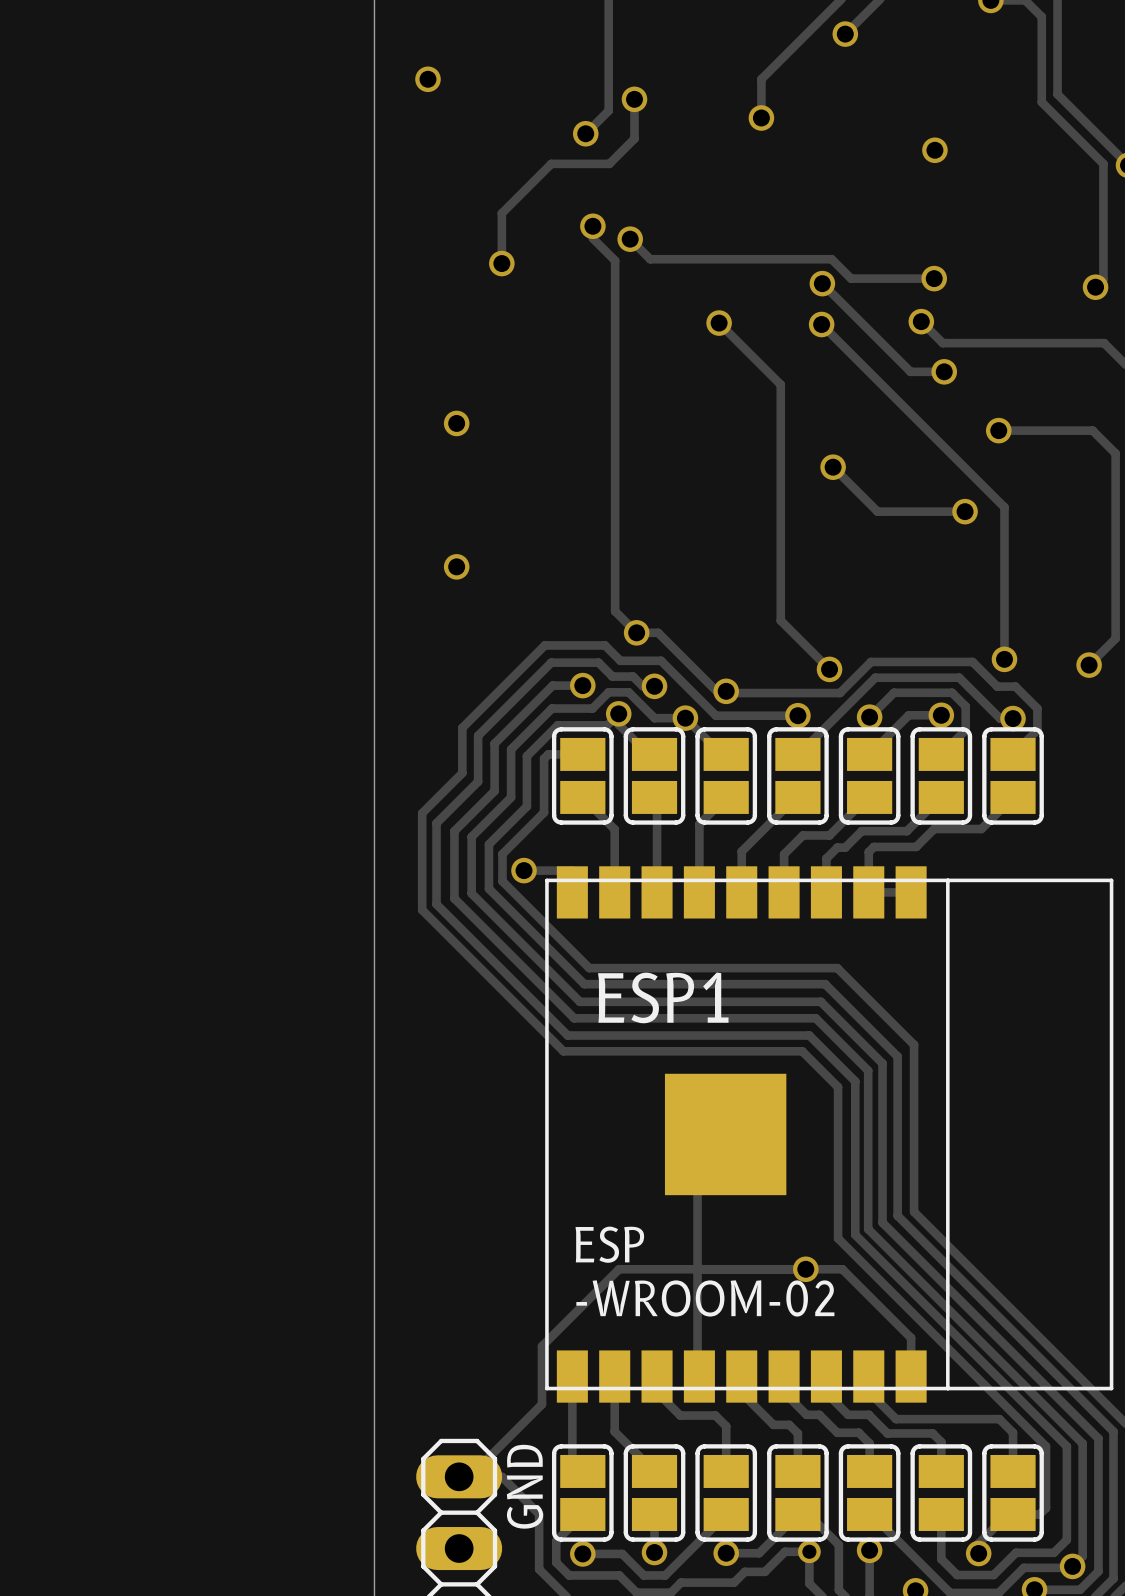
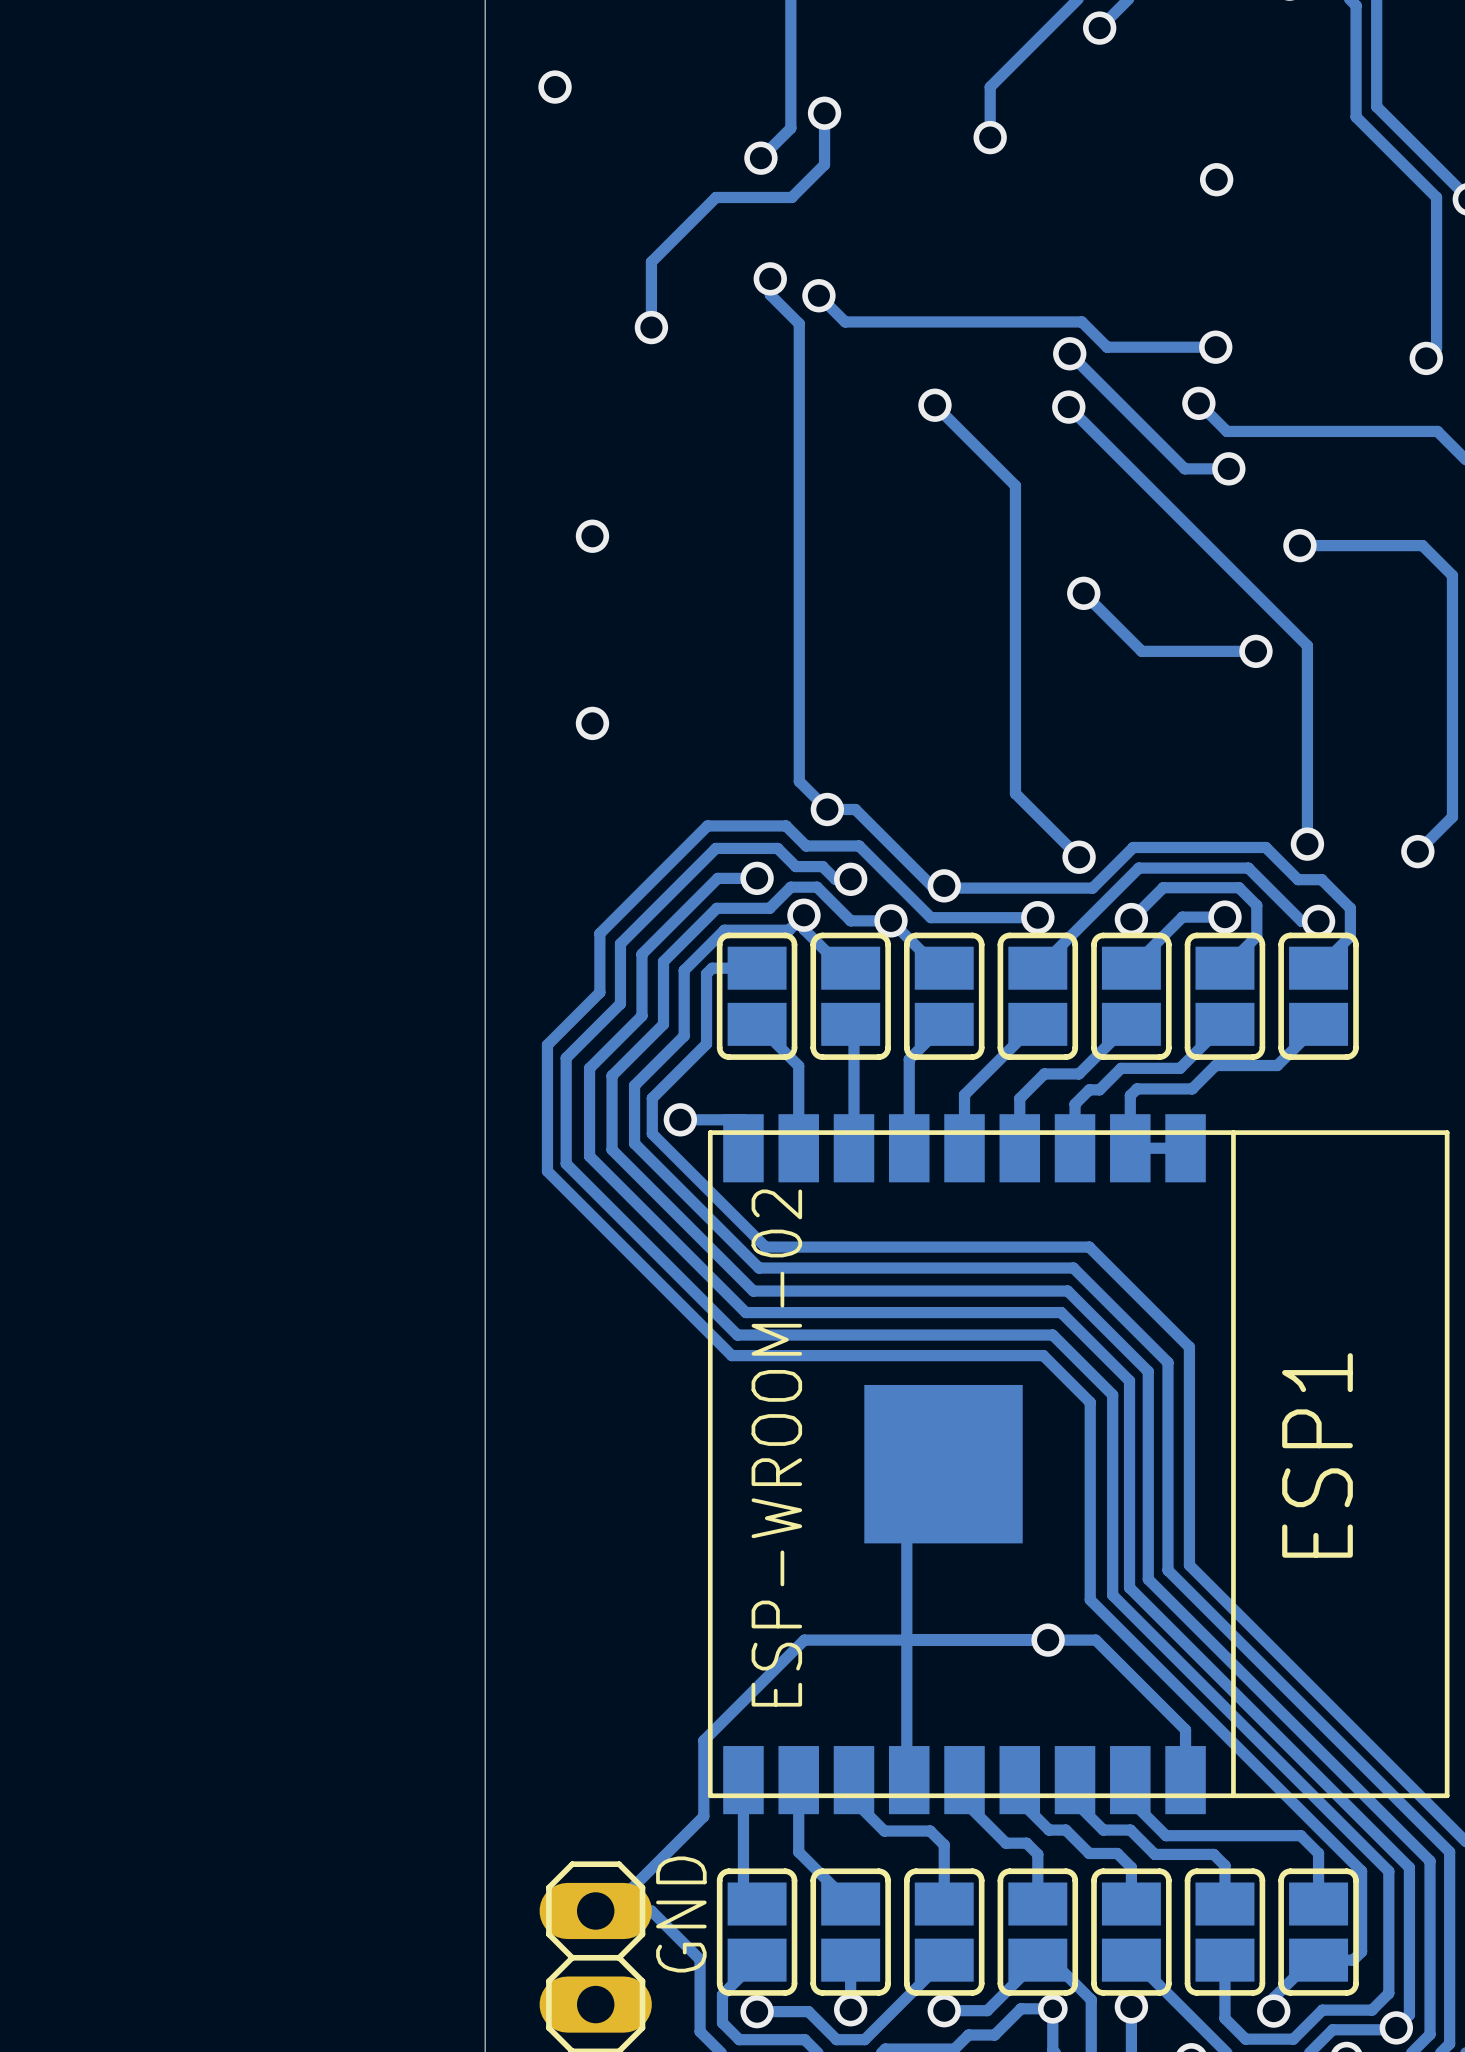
ESP1 name rotation: 0° (663, 997) -> 90° counterclockwise (1317, 1455)
ESP1 name position: ESP1 (663, 997) -> ESP1 (1317, 1455)
text: ESP (609, 1244) -> none
text: -WROOM-02 (705, 1298) -> ESP-WROOM-02 (776, 1448)

